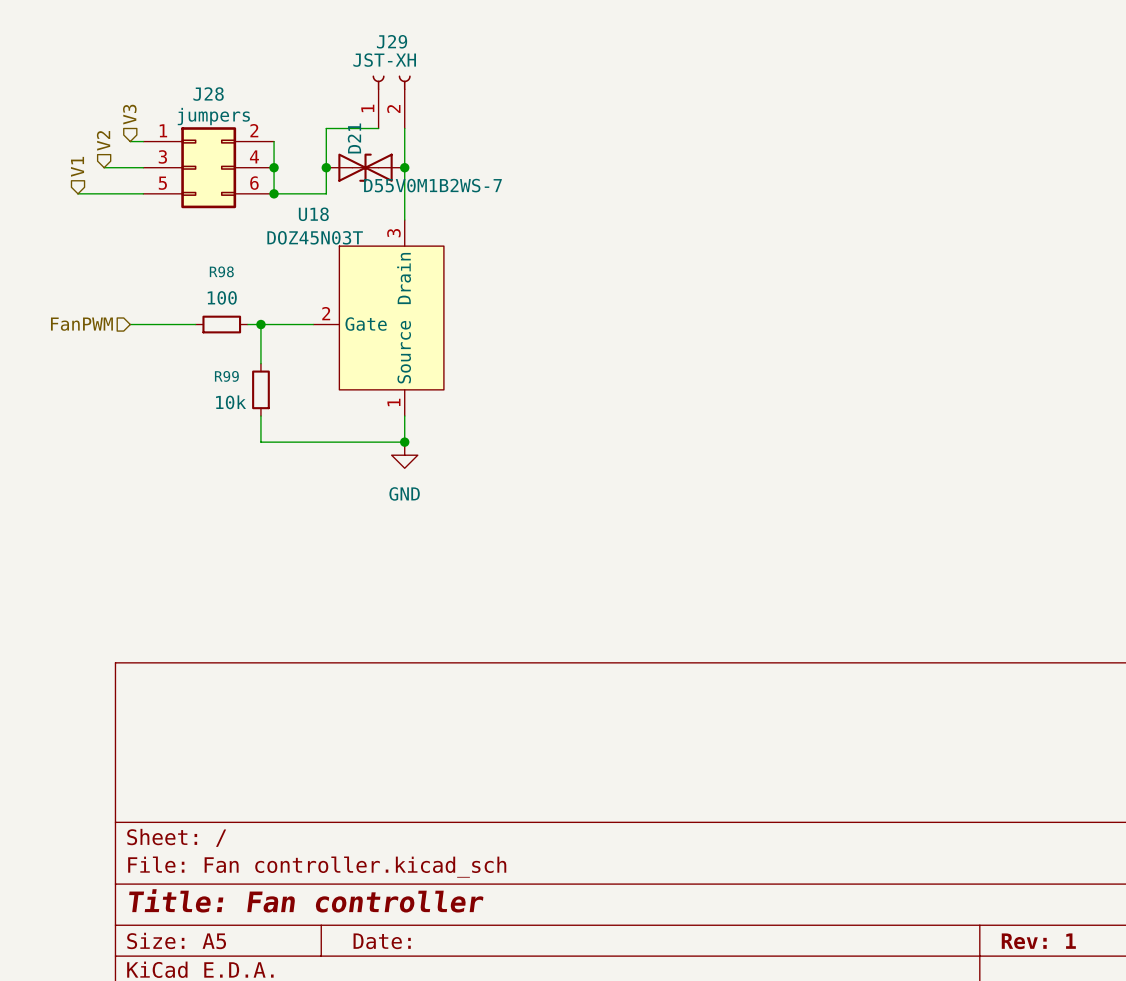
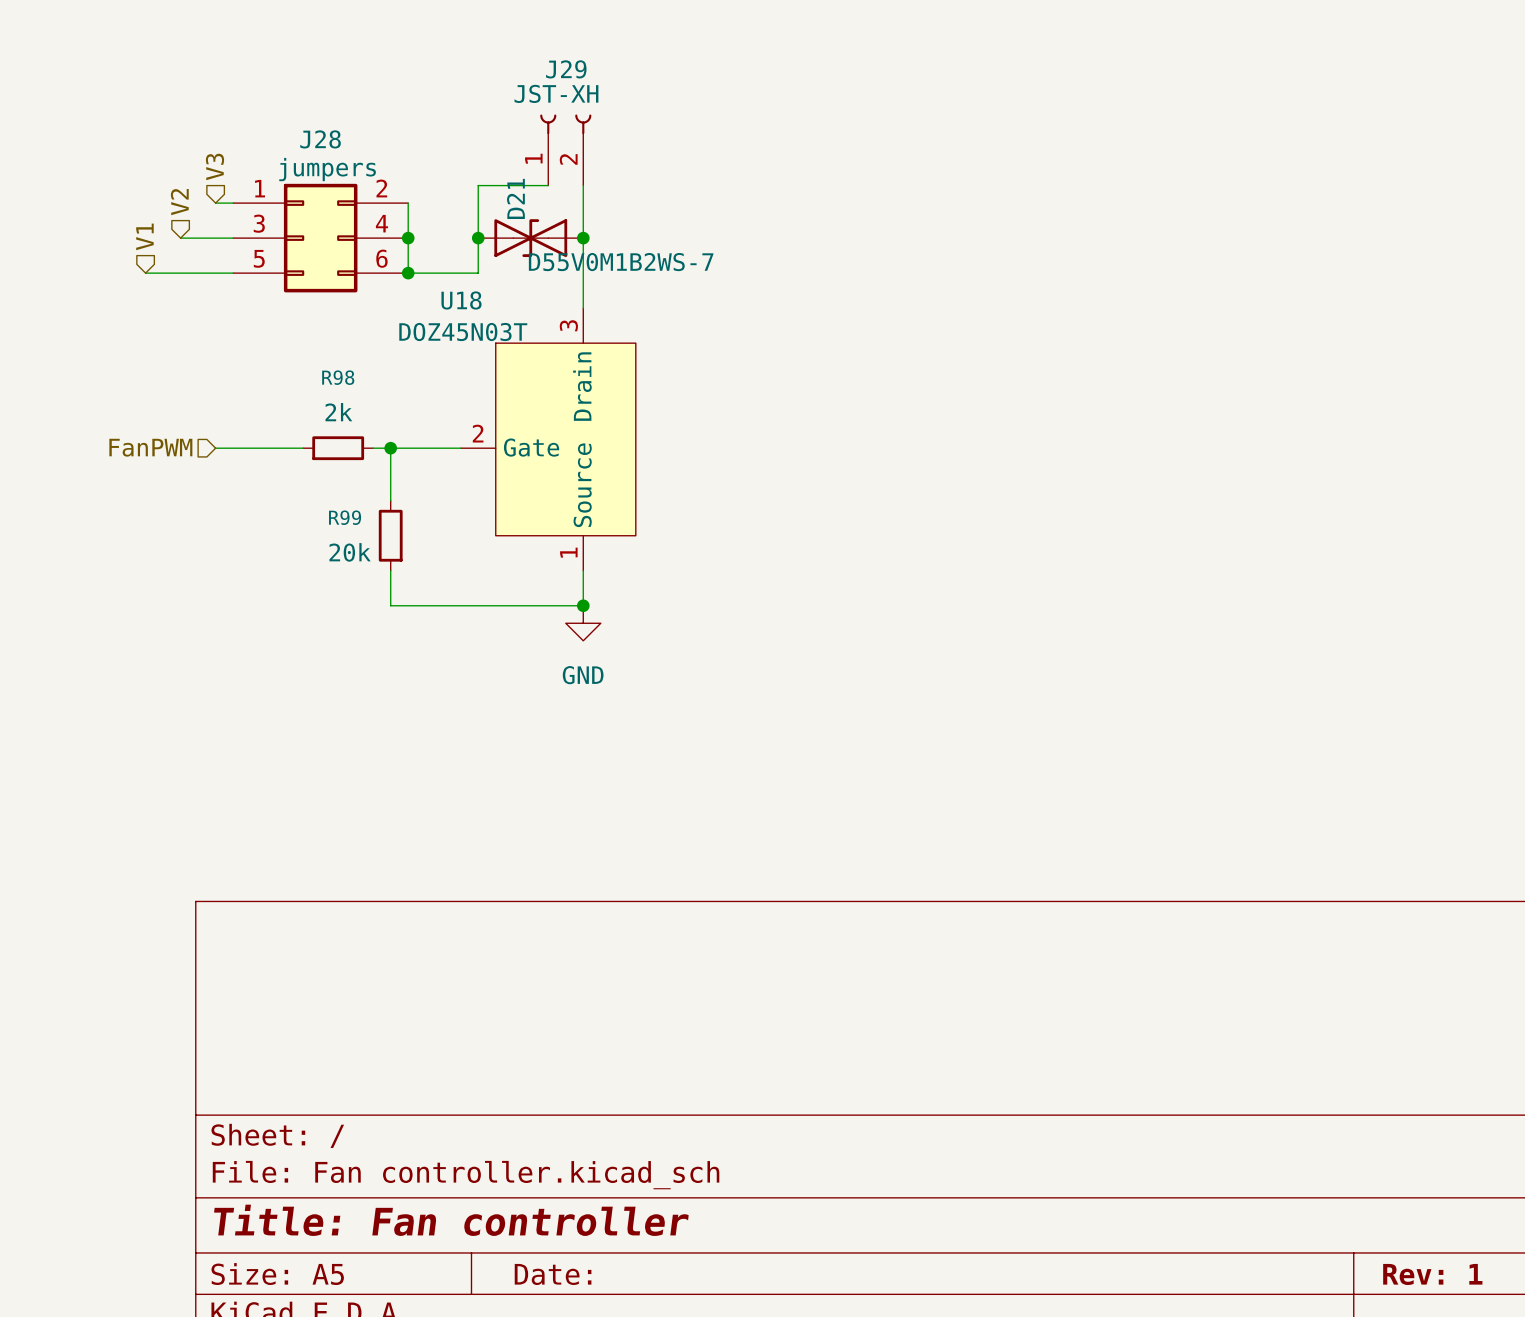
R98 value: 100 (222, 297) -> 2k (338, 412)
R99 value: 10k (231, 402) -> 20k (350, 552)

